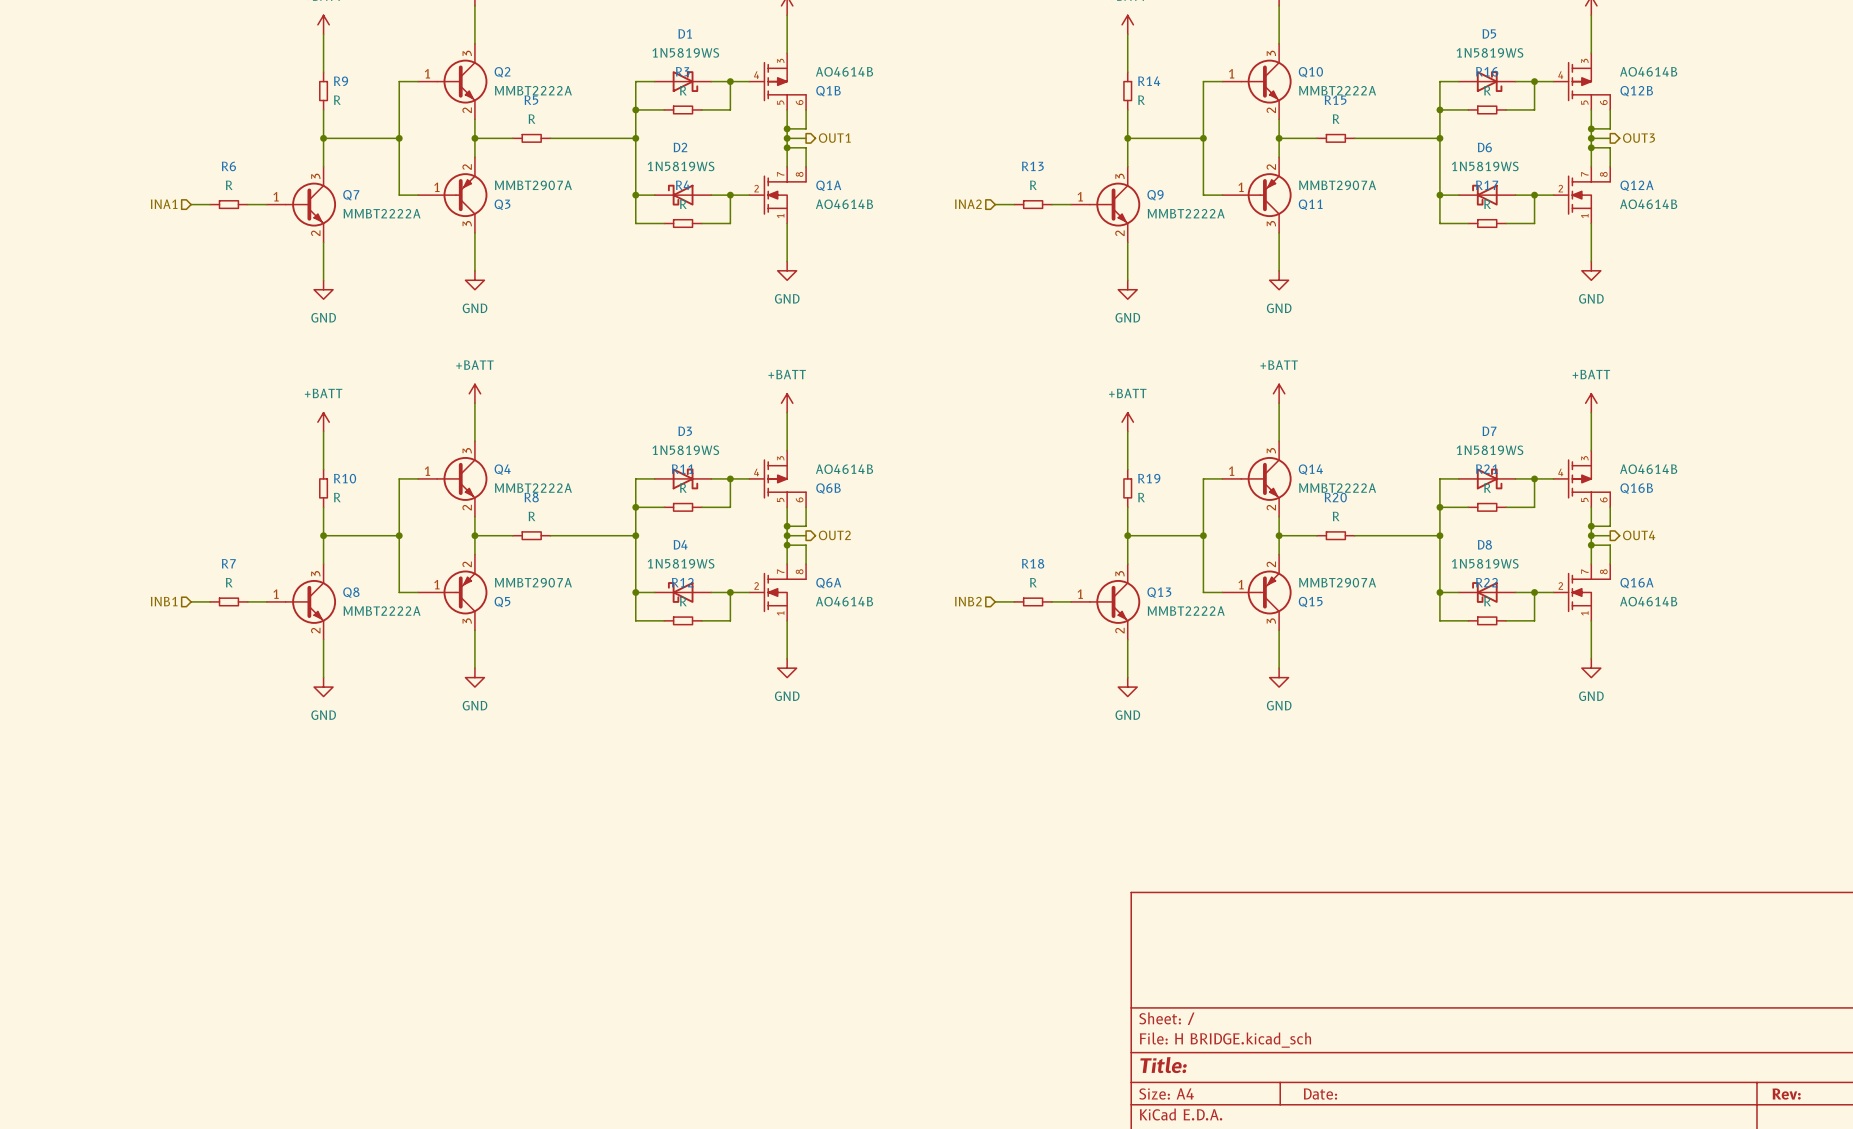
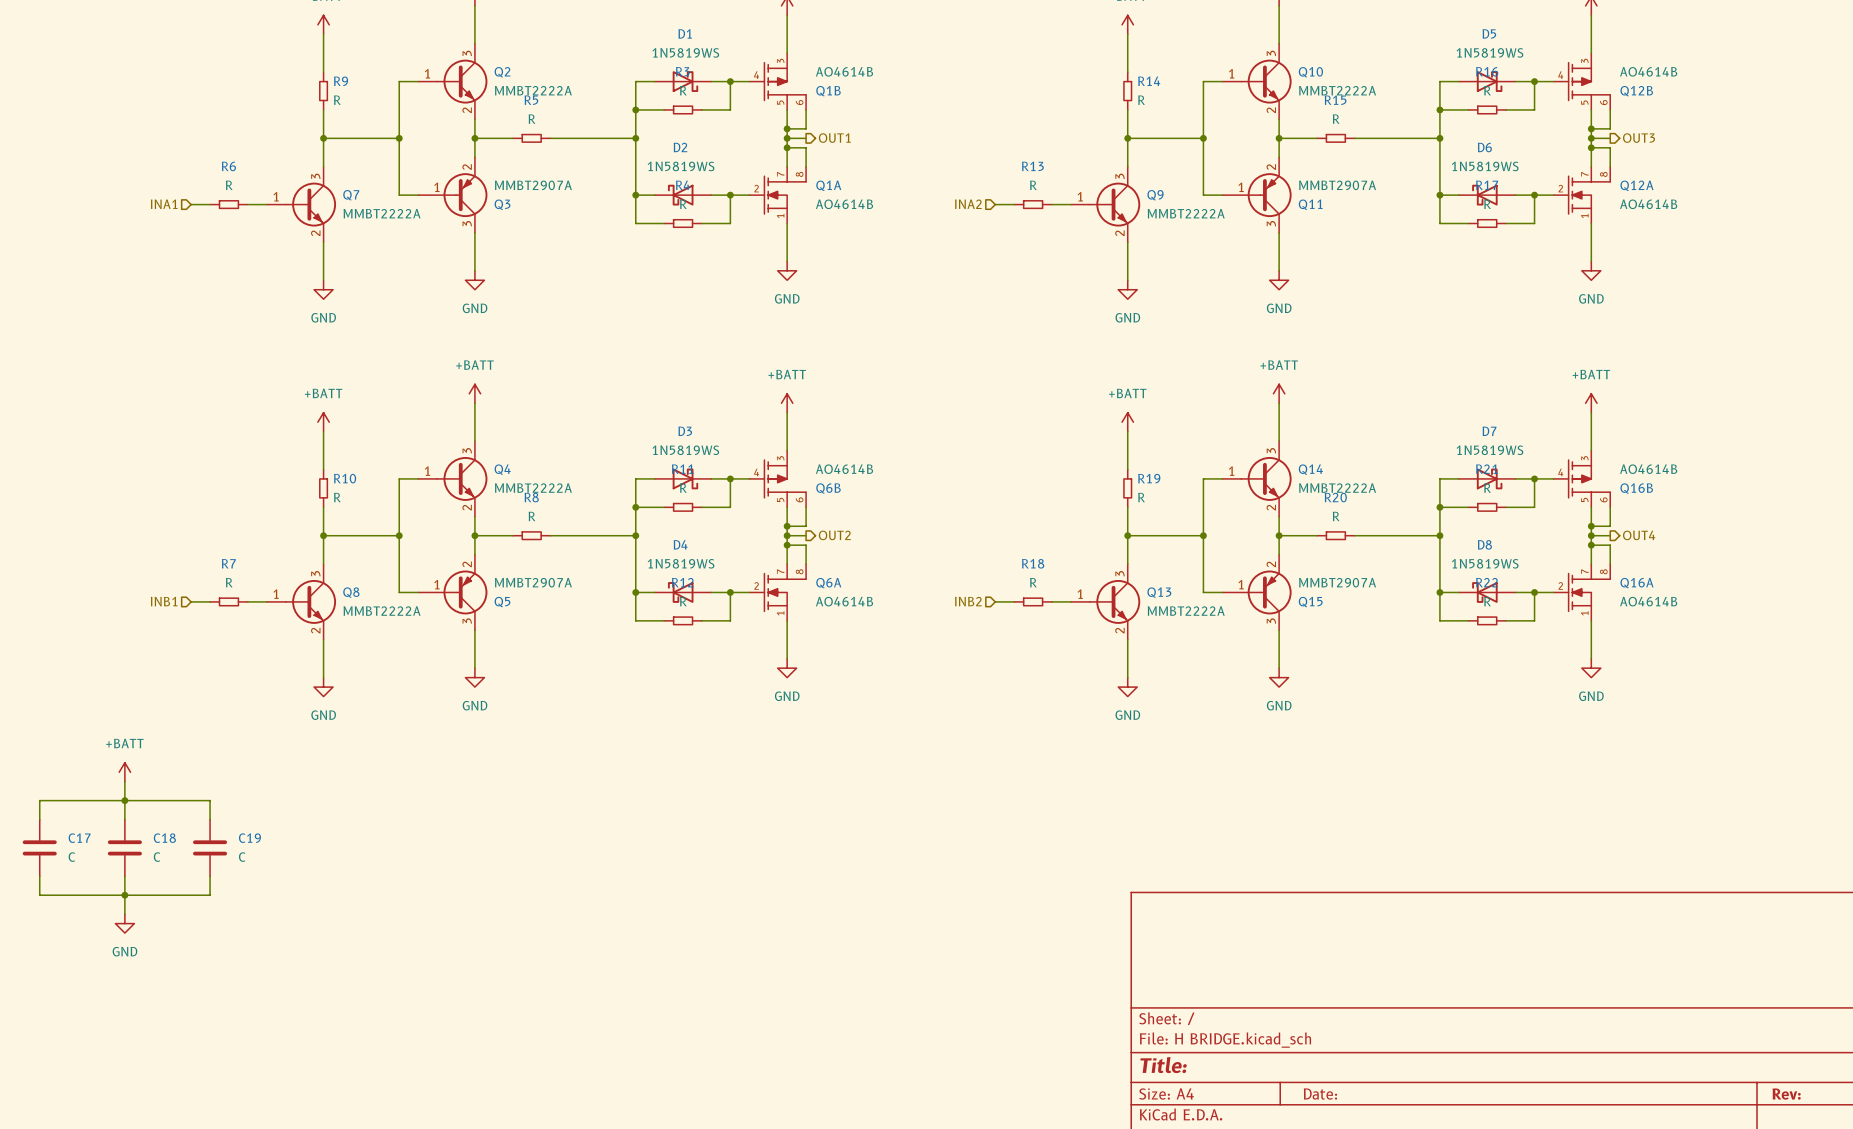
power symbol: none -> +BATT (124, 772)
wire: none -> (124, 781) (124, 819)
junction: none -> (124, 800)
wire: none -> (39, 819) (39, 800) (210, 800) (210, 819)
C17: none -> C (39, 847)
C18: none -> C (124, 847)
C19: none -> C (210, 847)
wire: none -> (39, 876) (39, 895) (210, 895) (210, 876)
wire: none -> (124, 876) (124, 914)
junction: none -> (124, 895)
power symbol: none -> GND (124, 923)

